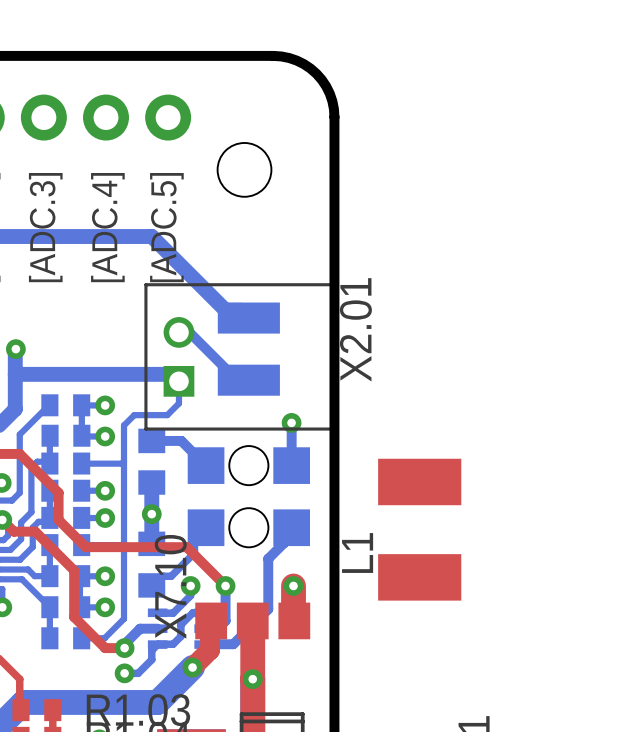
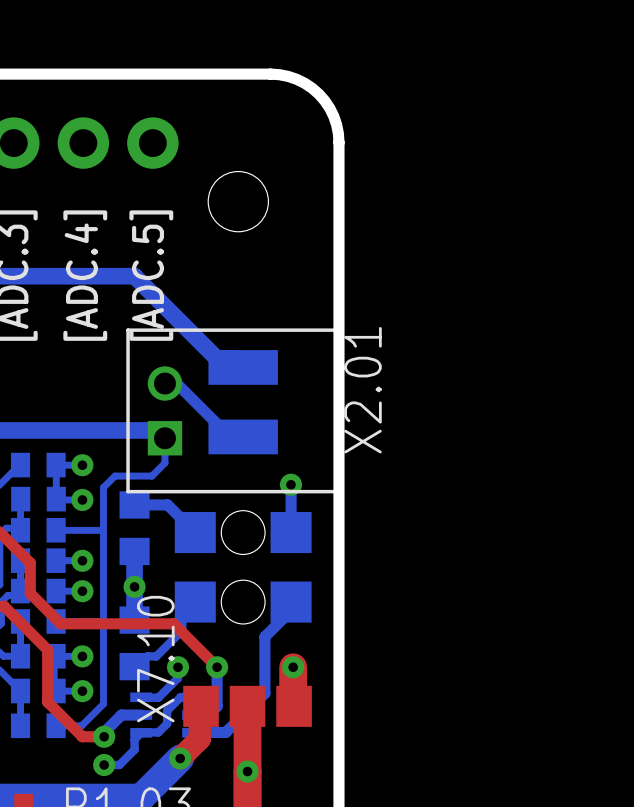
L1: (419, 529) -> none

